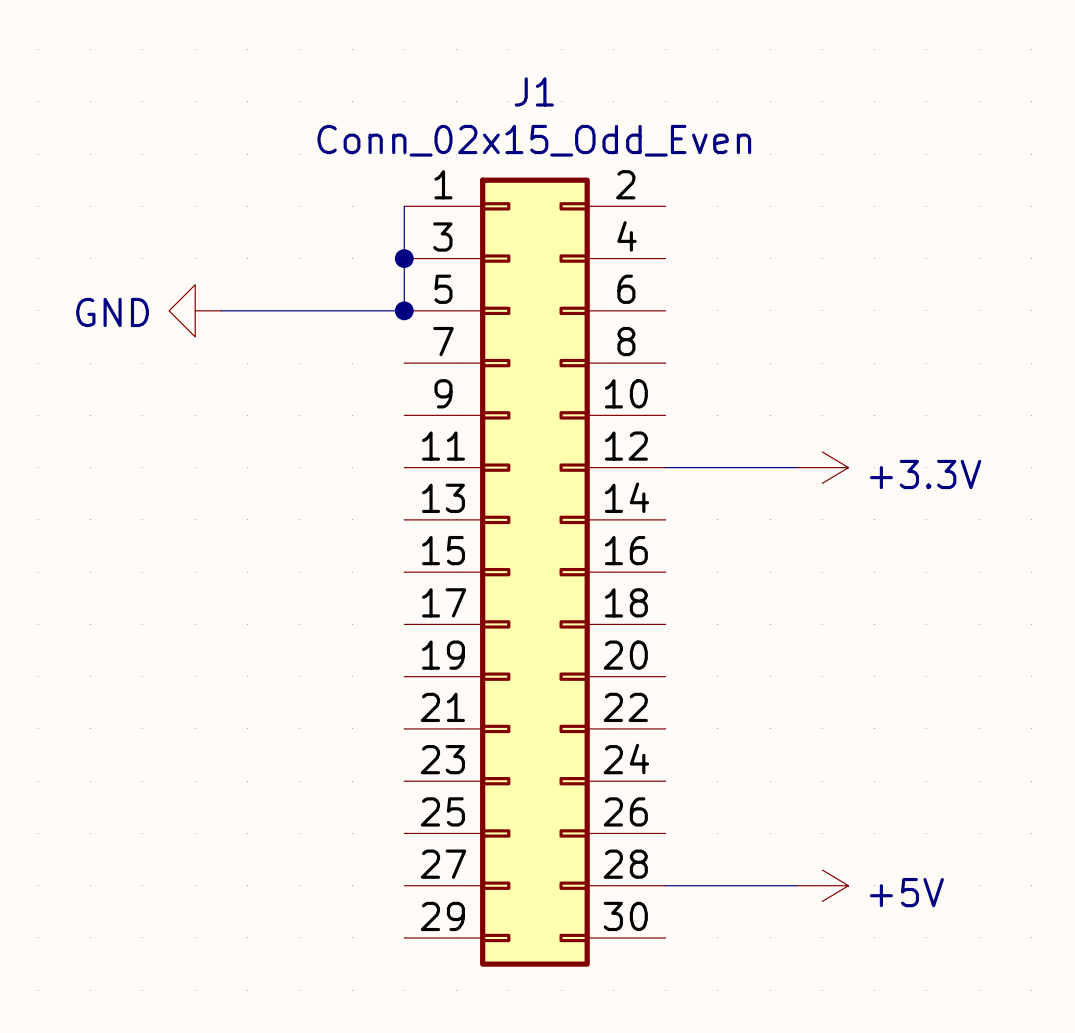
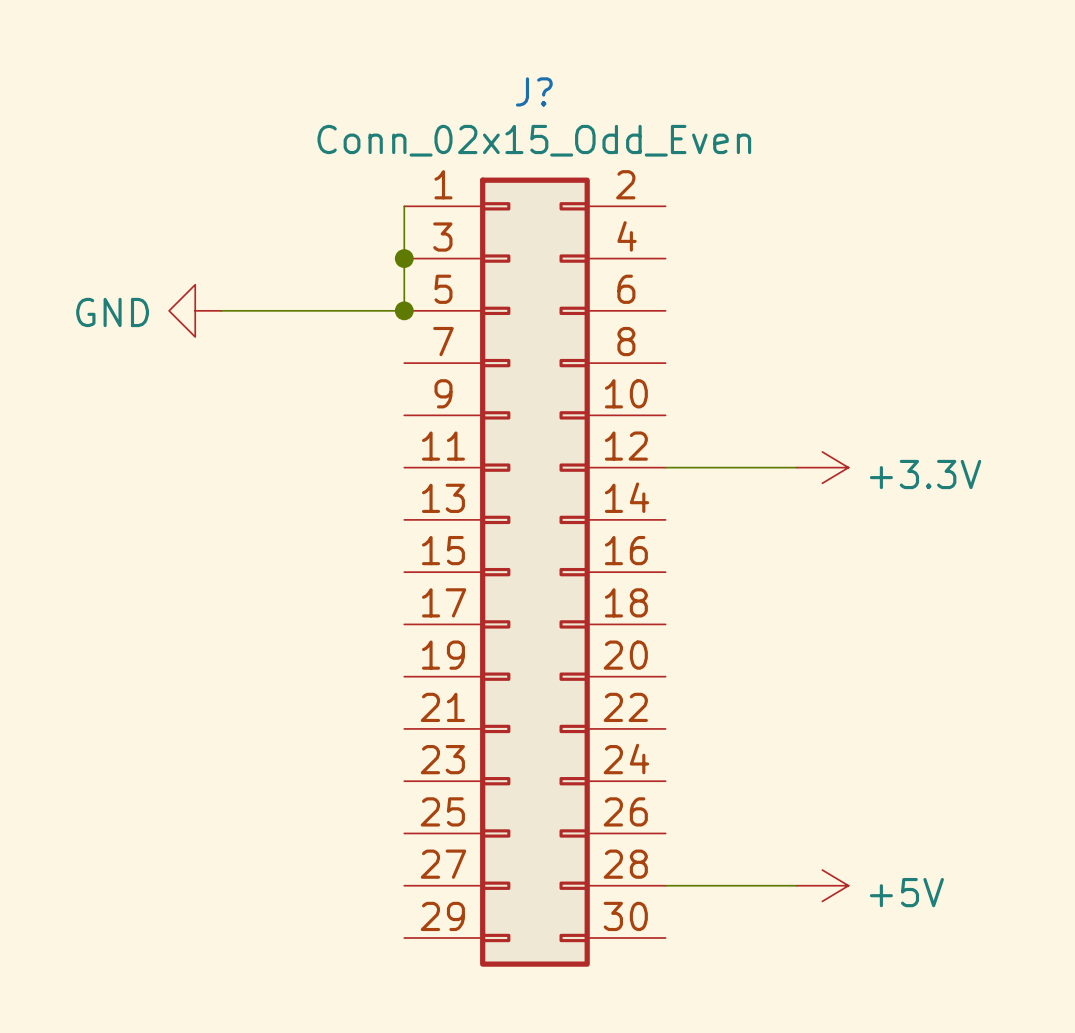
J1 name: J1 (534, 91) -> J? (534, 91)

